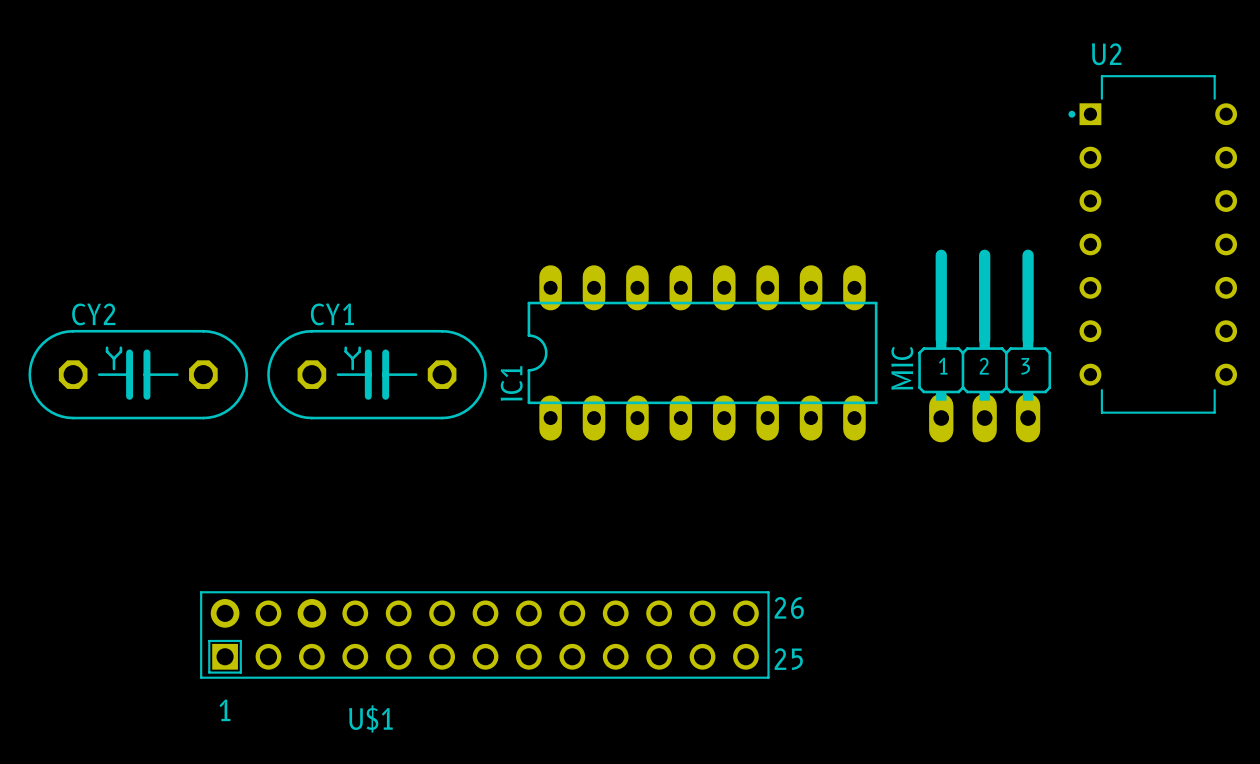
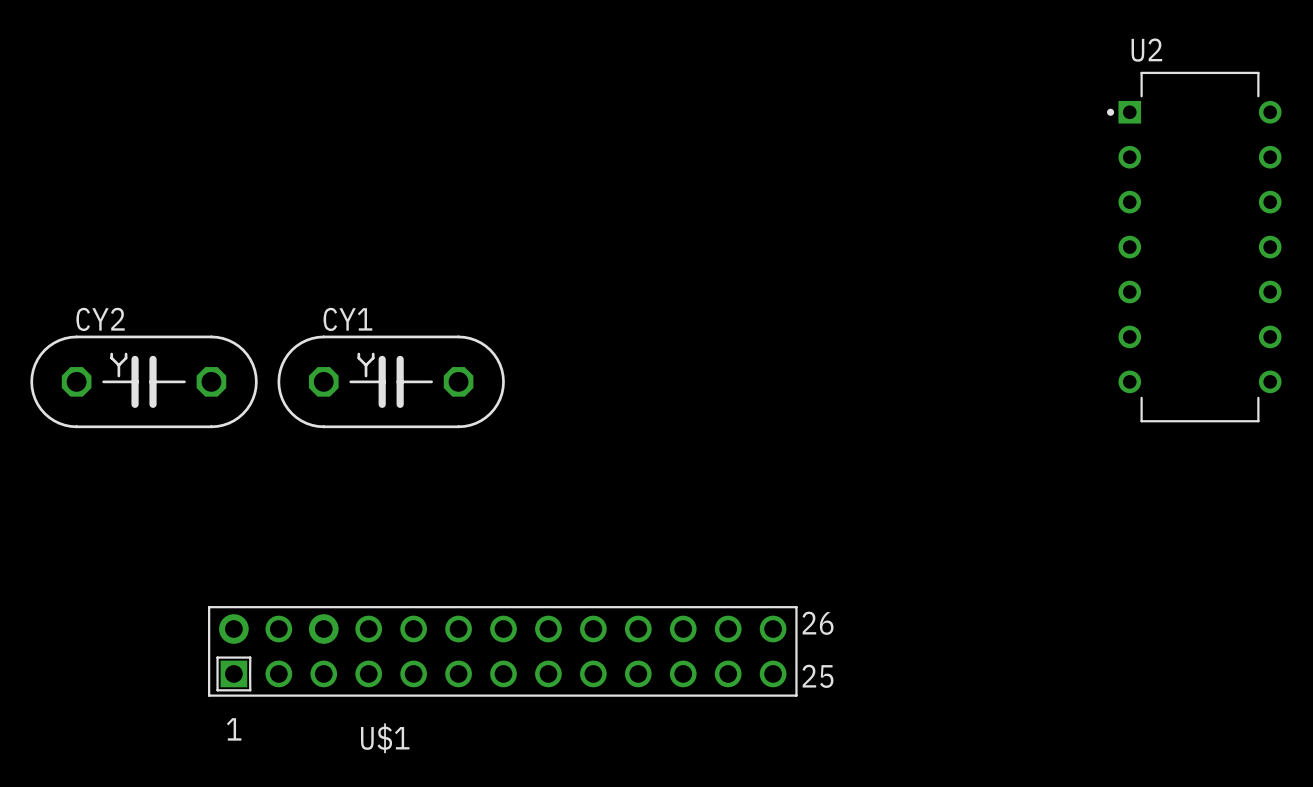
MIC: (984, 345) -> none
IC1: (702, 352) -> none

